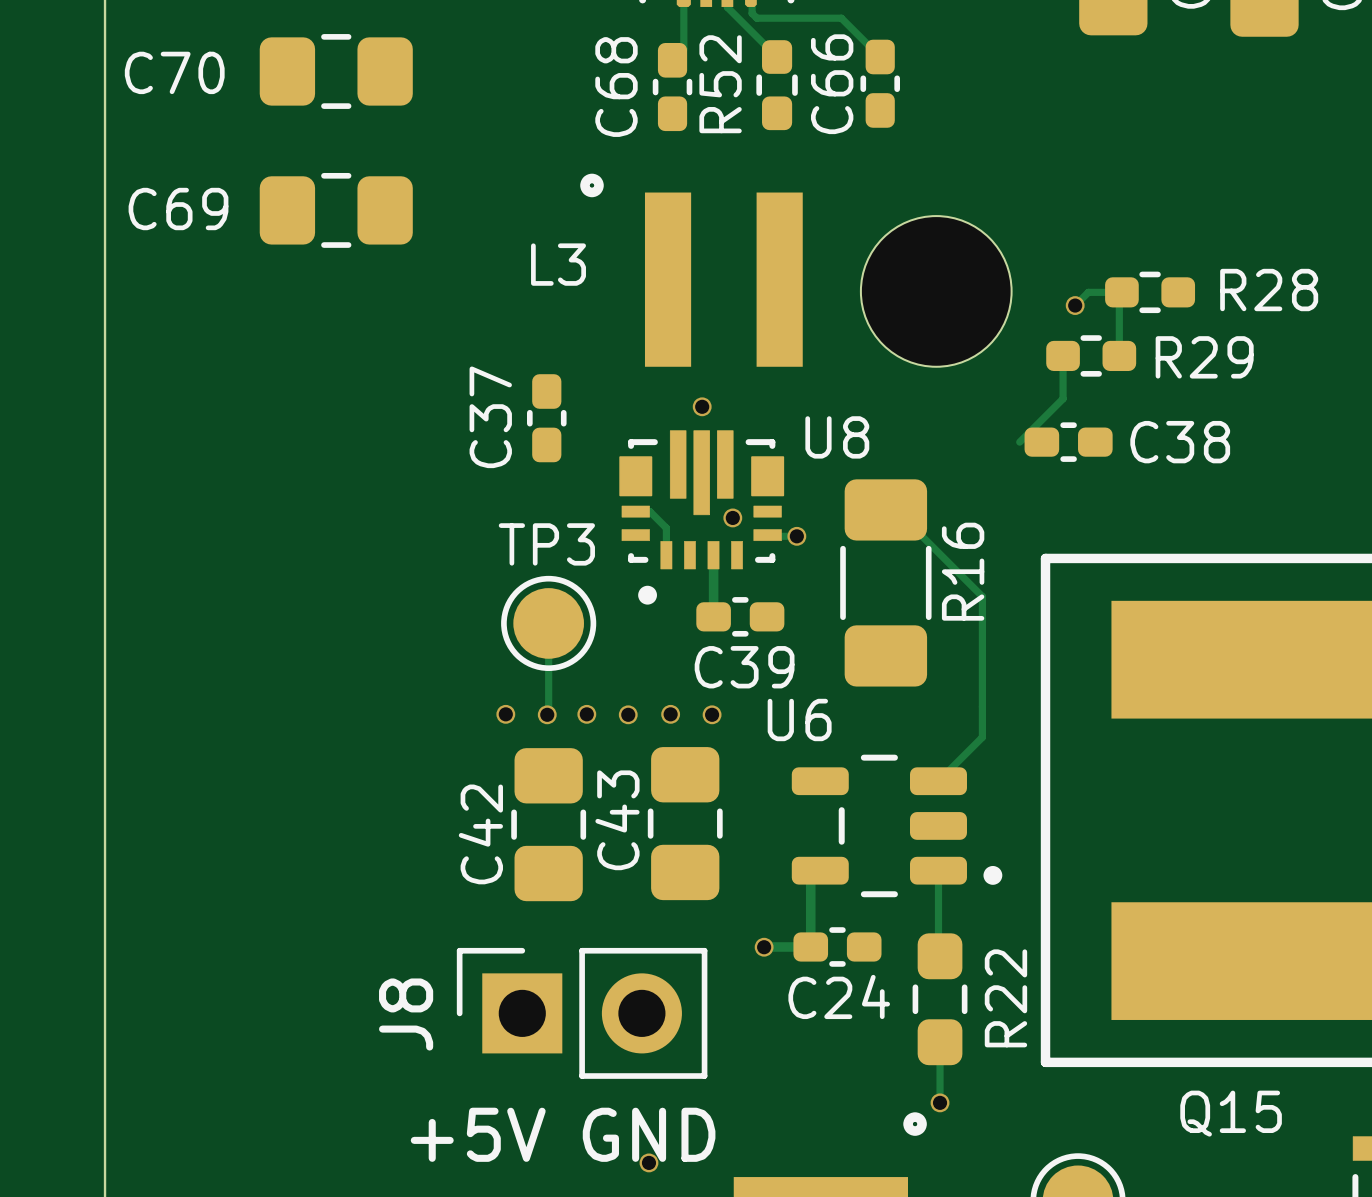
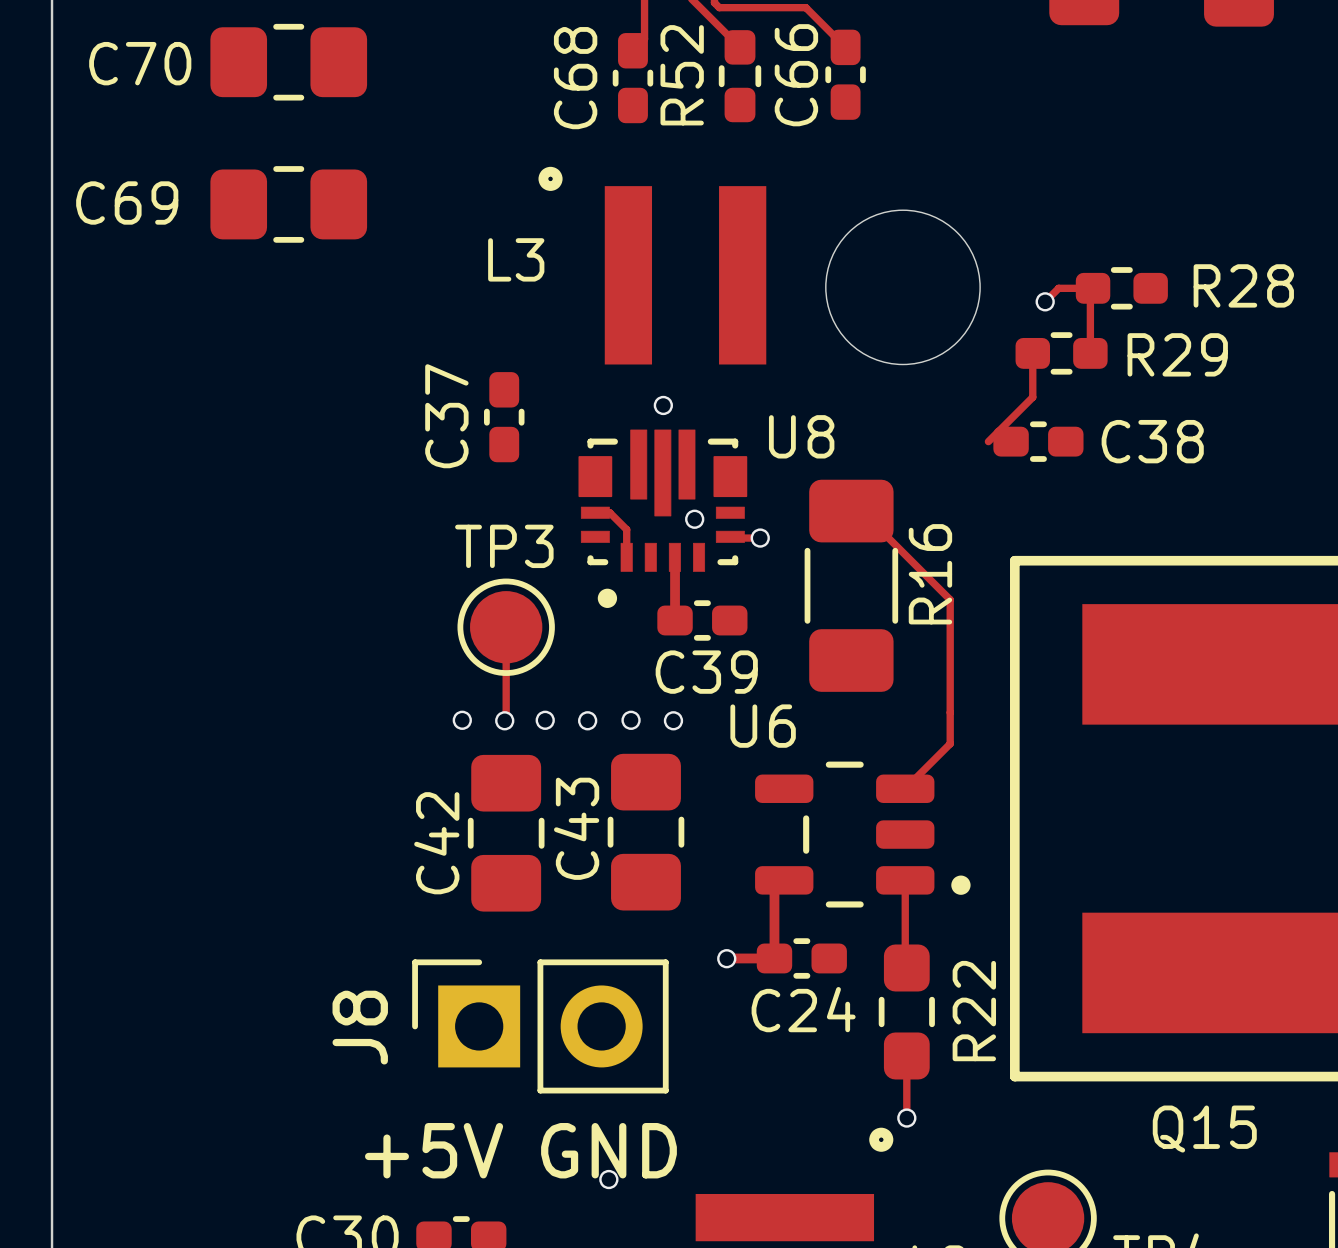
C70 name position: C70 (174, 72) -> C70 (140, 63)

